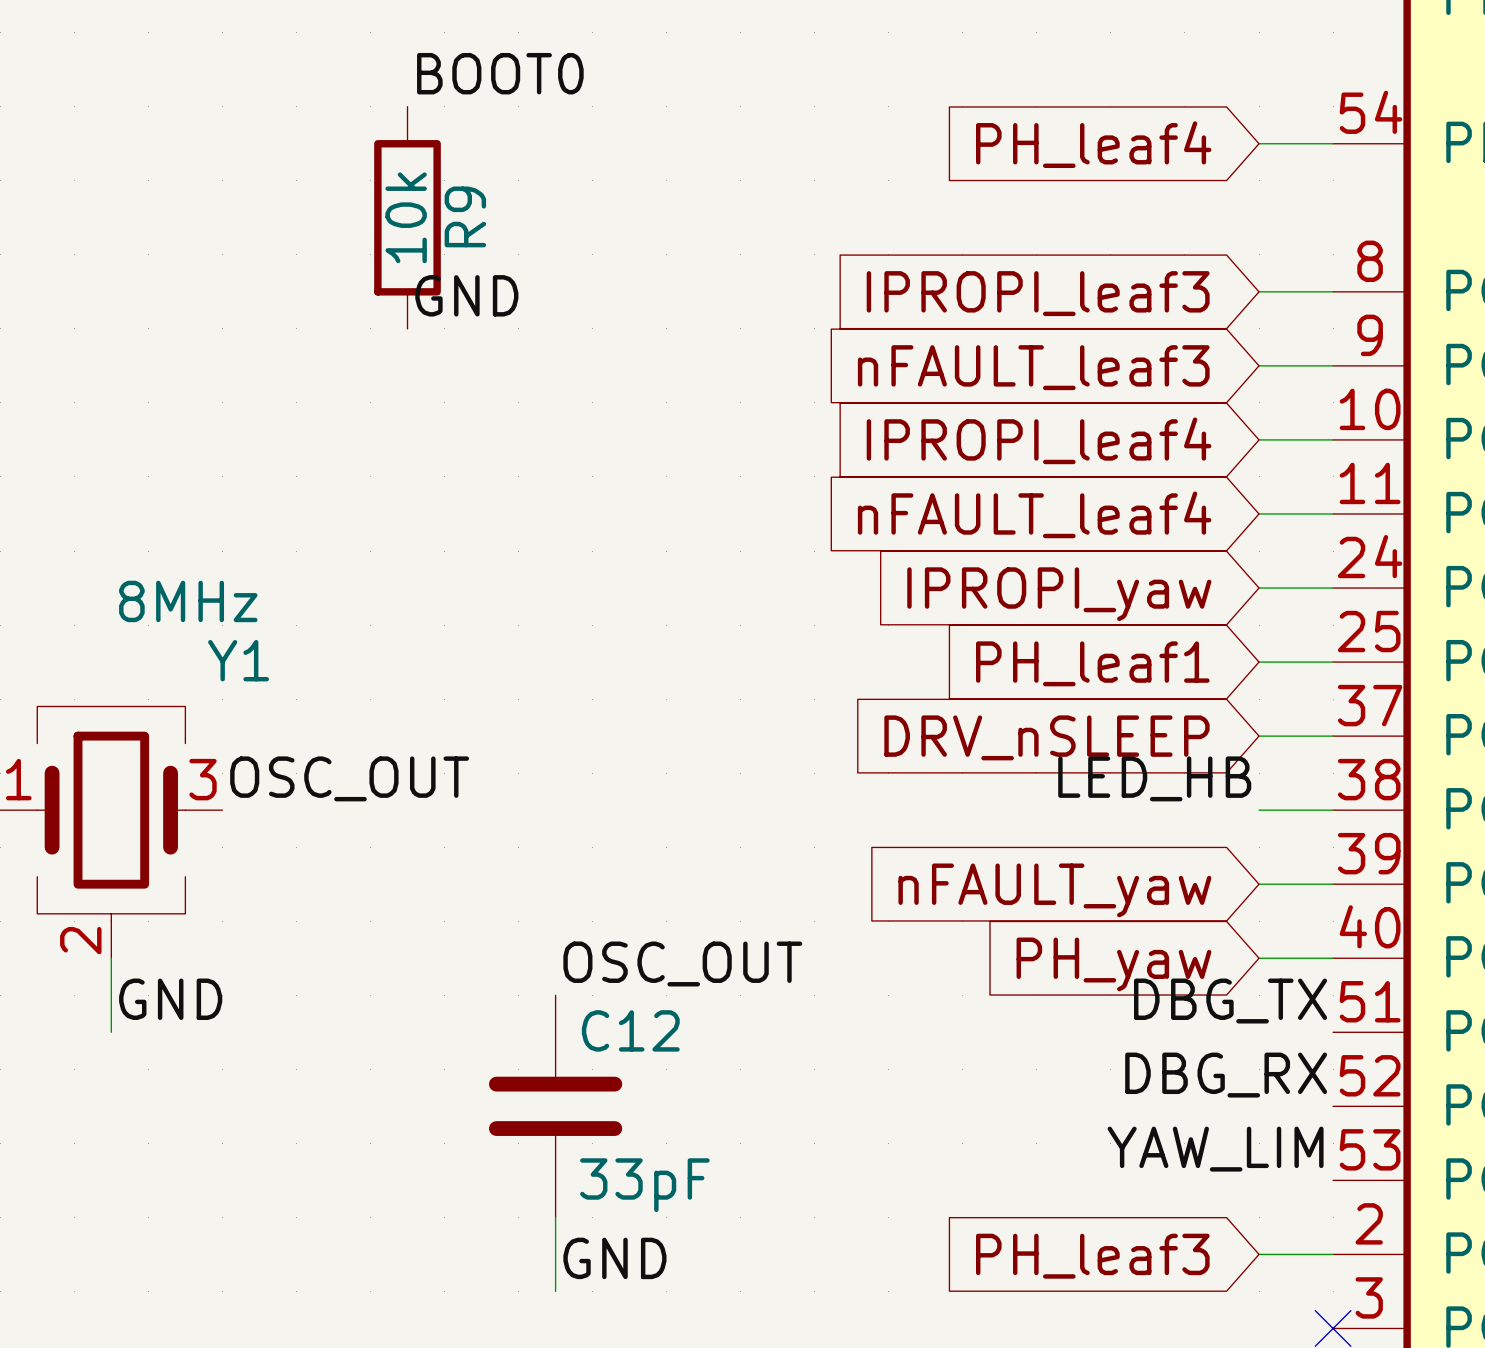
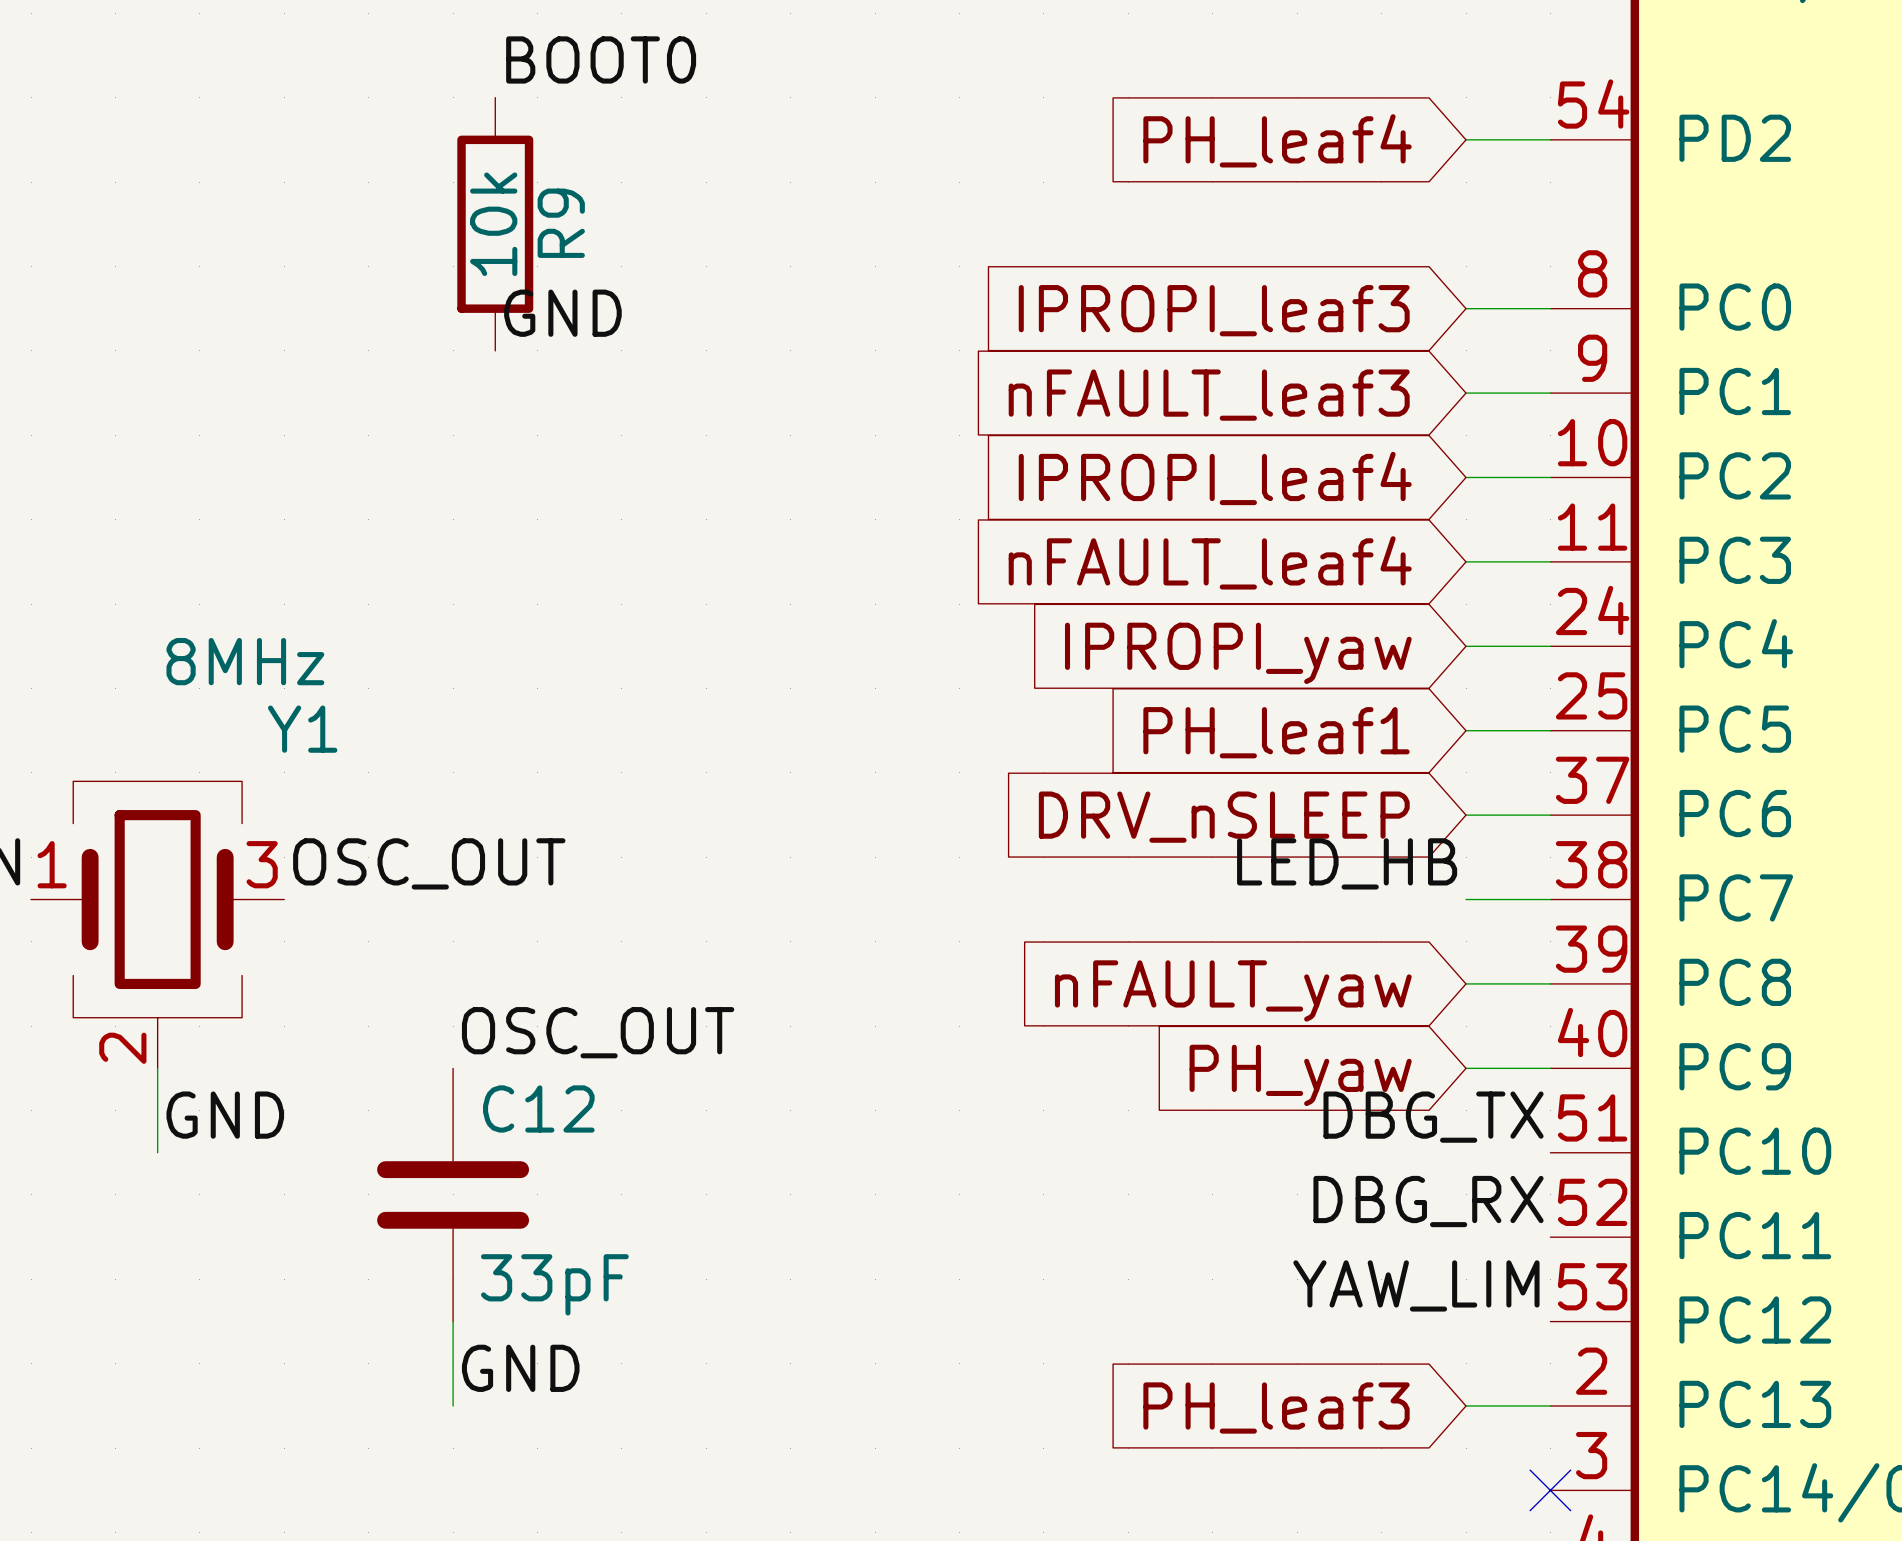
label position: OSC_OUT (682, 963) -> OSC_OUT (598, 1032)
C12 position: (555, 1106) -> (453, 1194)
wire: (555, 1217) (555, 1291) -> (453, 1321) (453, 1405)
label position: GND (614, 1258) -> GND (520, 1368)

